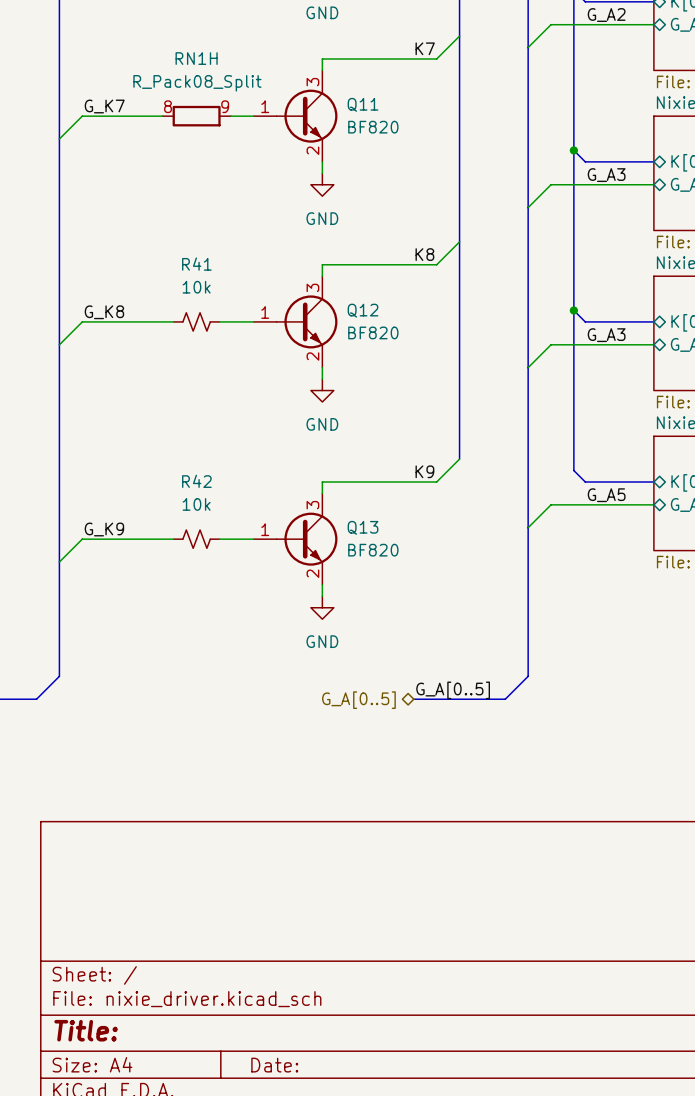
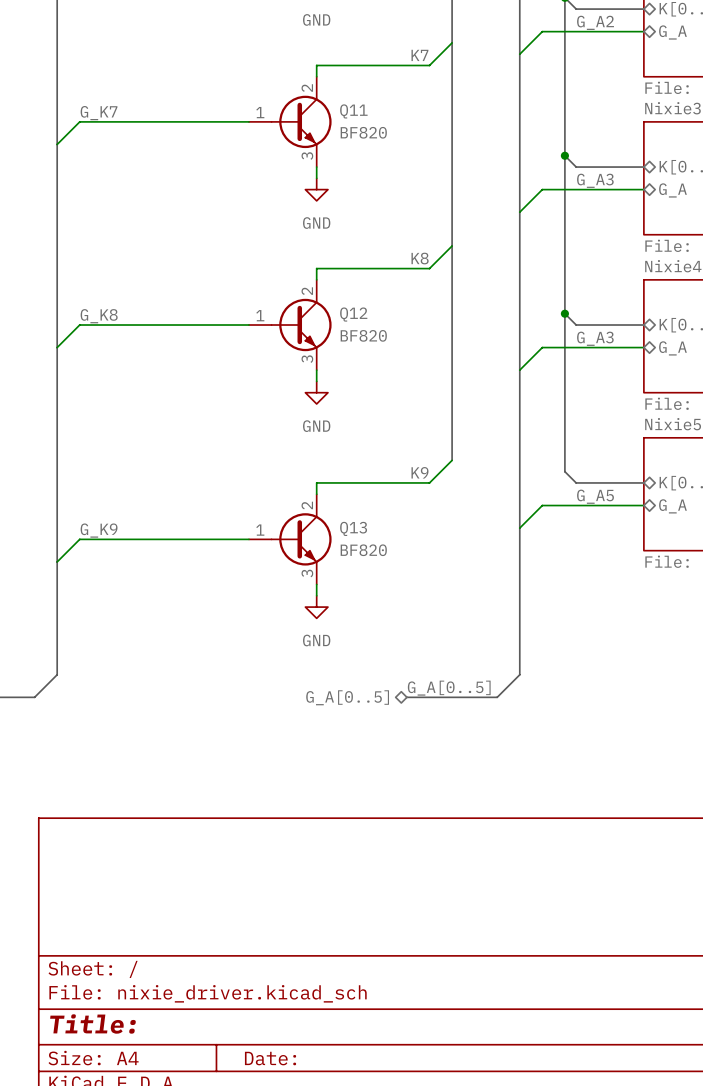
Q11 pin number: 3 (312, 82) -> 2 (307, 88)
wire: none -> (158, 121) (226, 121)
RN1H: R_Pack08_Split (196, 116) -> none
Q11 pin number: 2 (312, 150) -> 3 (307, 156)
Q12 pin number: 3 (312, 287) -> 2 (307, 291)
R41: 10k (196, 321) -> none
Q12 pin number: 2 (312, 356) -> 3 (307, 359)
Q13 pin number: 3 (312, 505) -> 2 (307, 505)
R42: 10k (196, 539) -> none
Q13 pin number: 2 (312, 573) -> 3 (307, 573)

